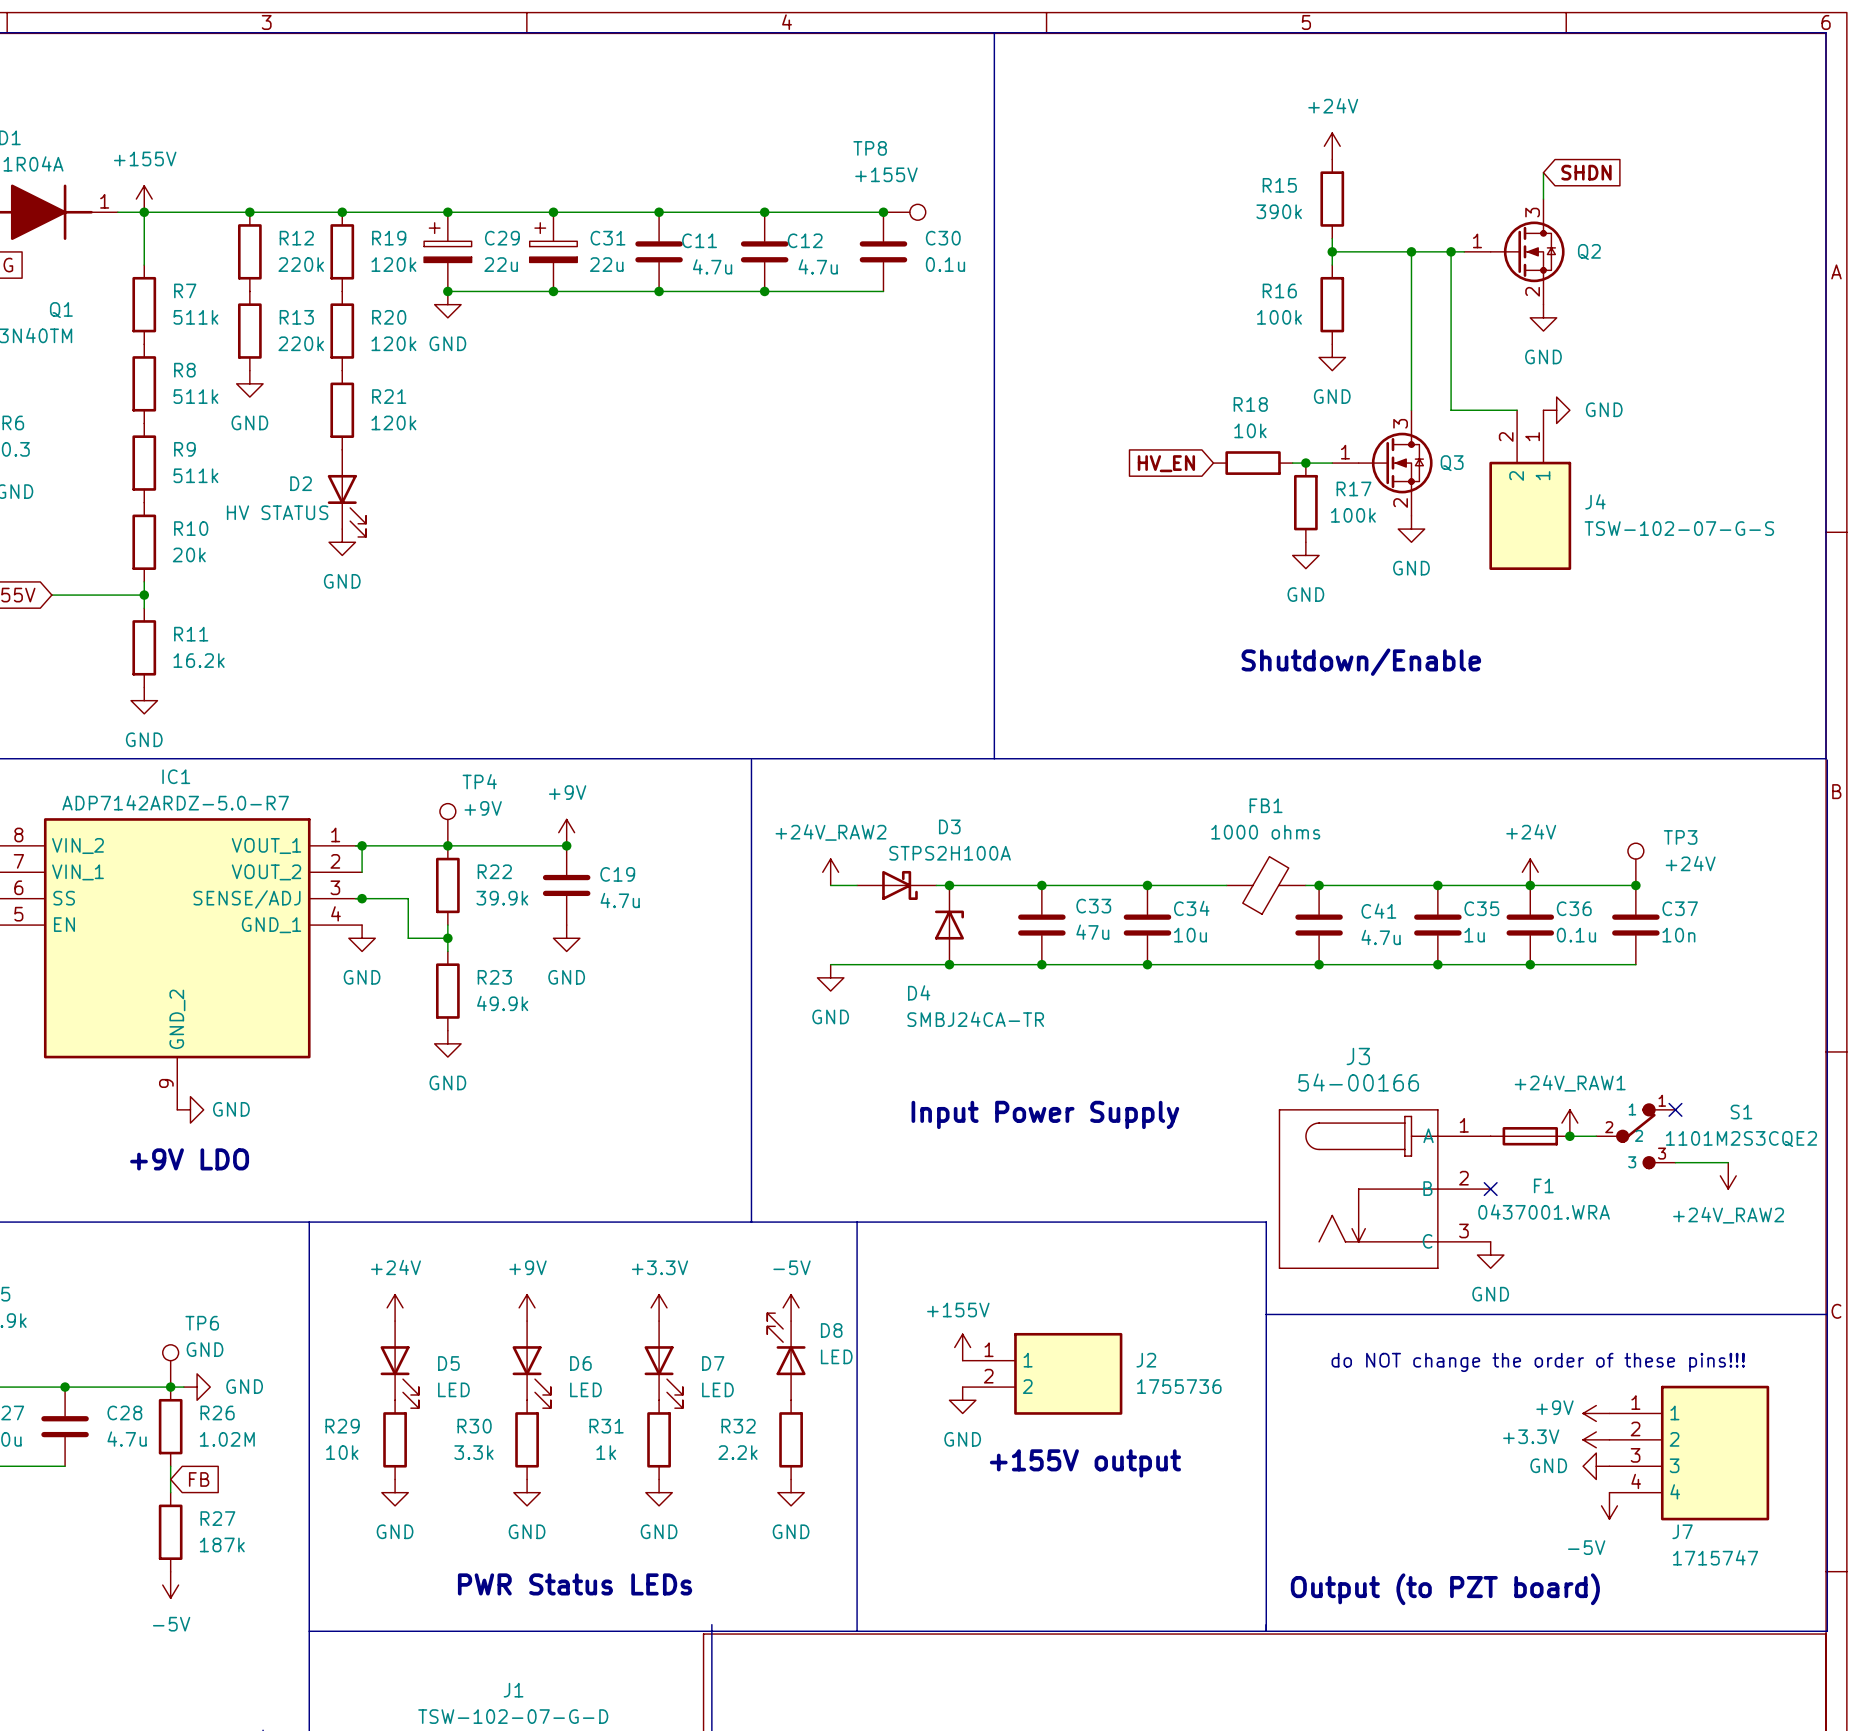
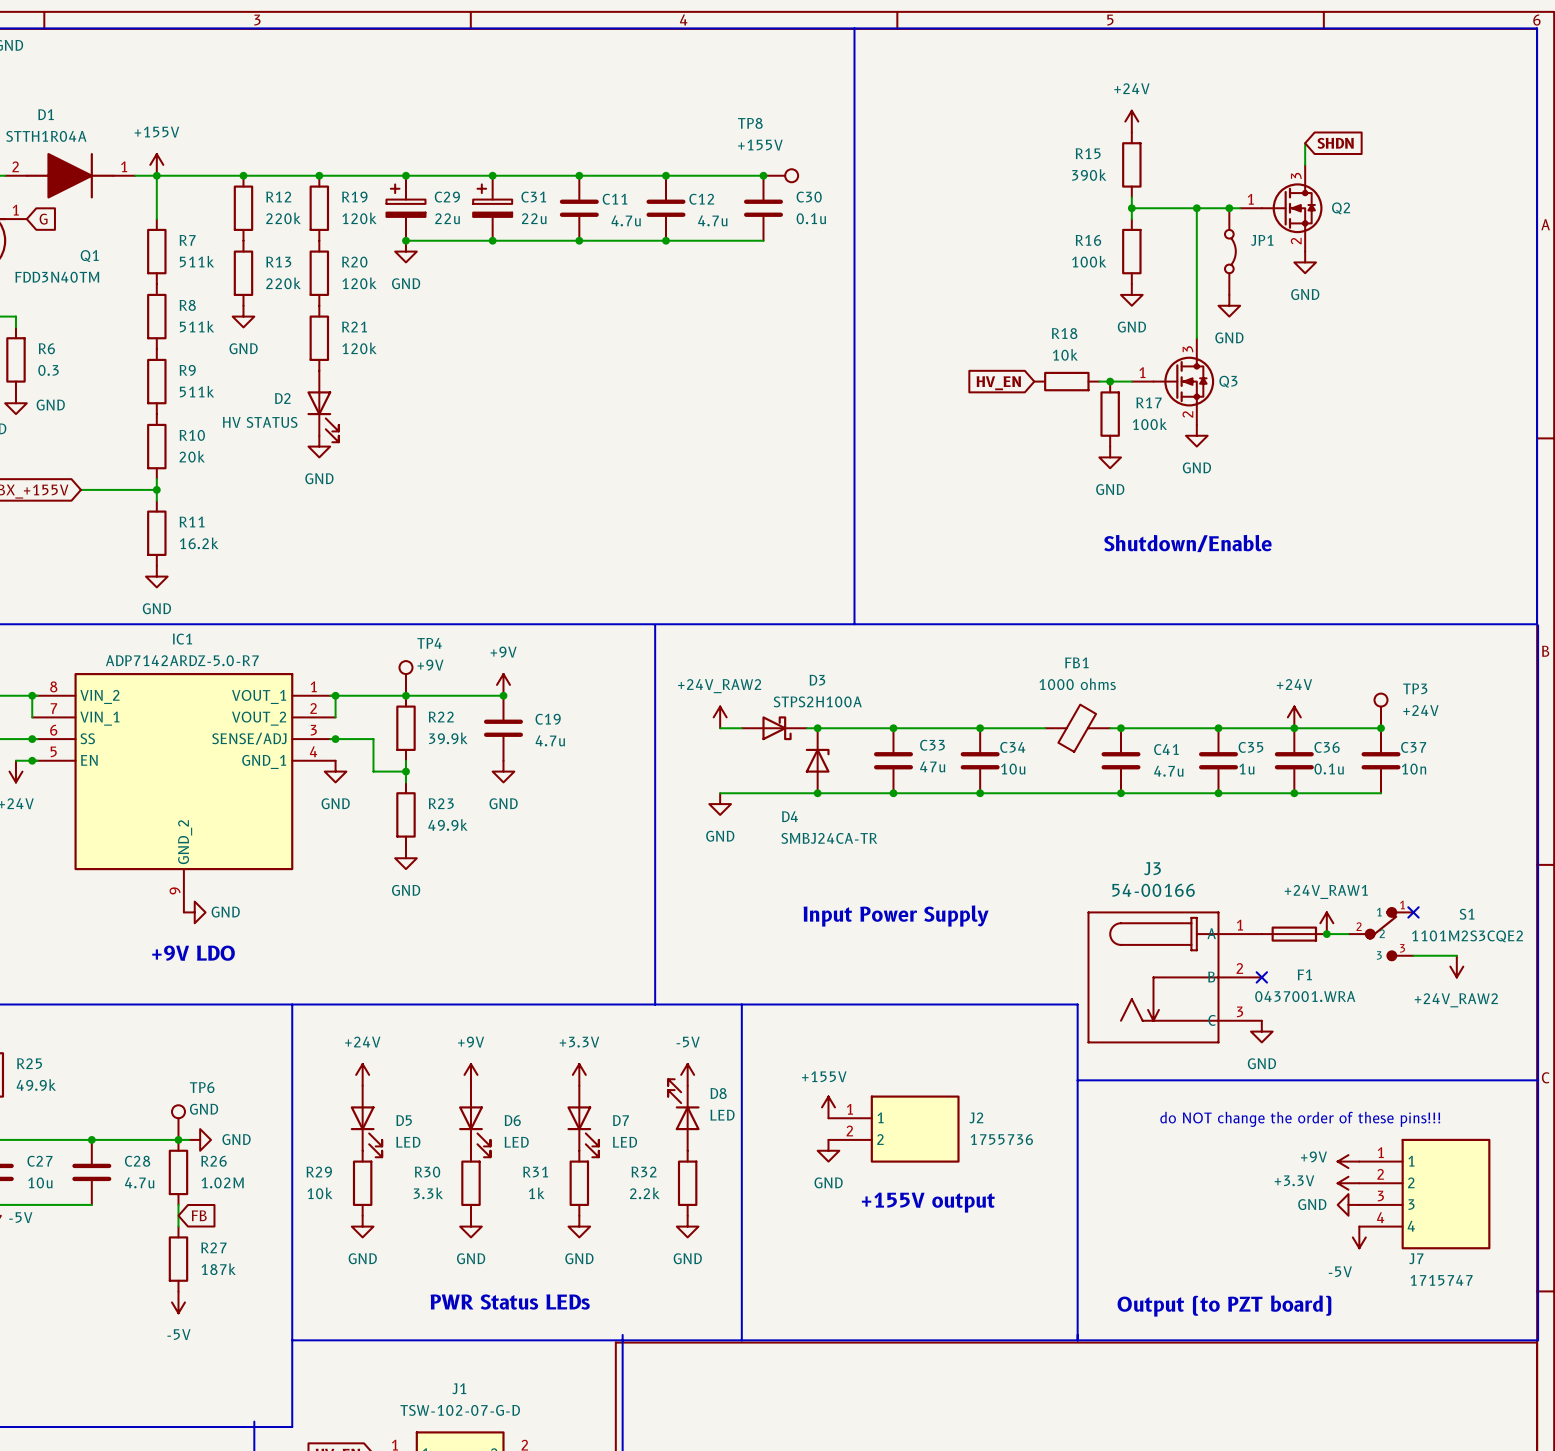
wire: (1451, 251) (1451, 410) (1517, 410) -> none
JP1: none -> (1230, 251)
power symbol rotation: 0° (1556, 410) -> 90° clockwise (1229, 305)
power symbol position: GND (1556, 410) -> GND (1229, 305)
J4: TSW-102-07-G-S (1530, 490) -> none
text position: Shutdown/Enable (1361, 662) -> Shutdown/Enable (1187, 543)

